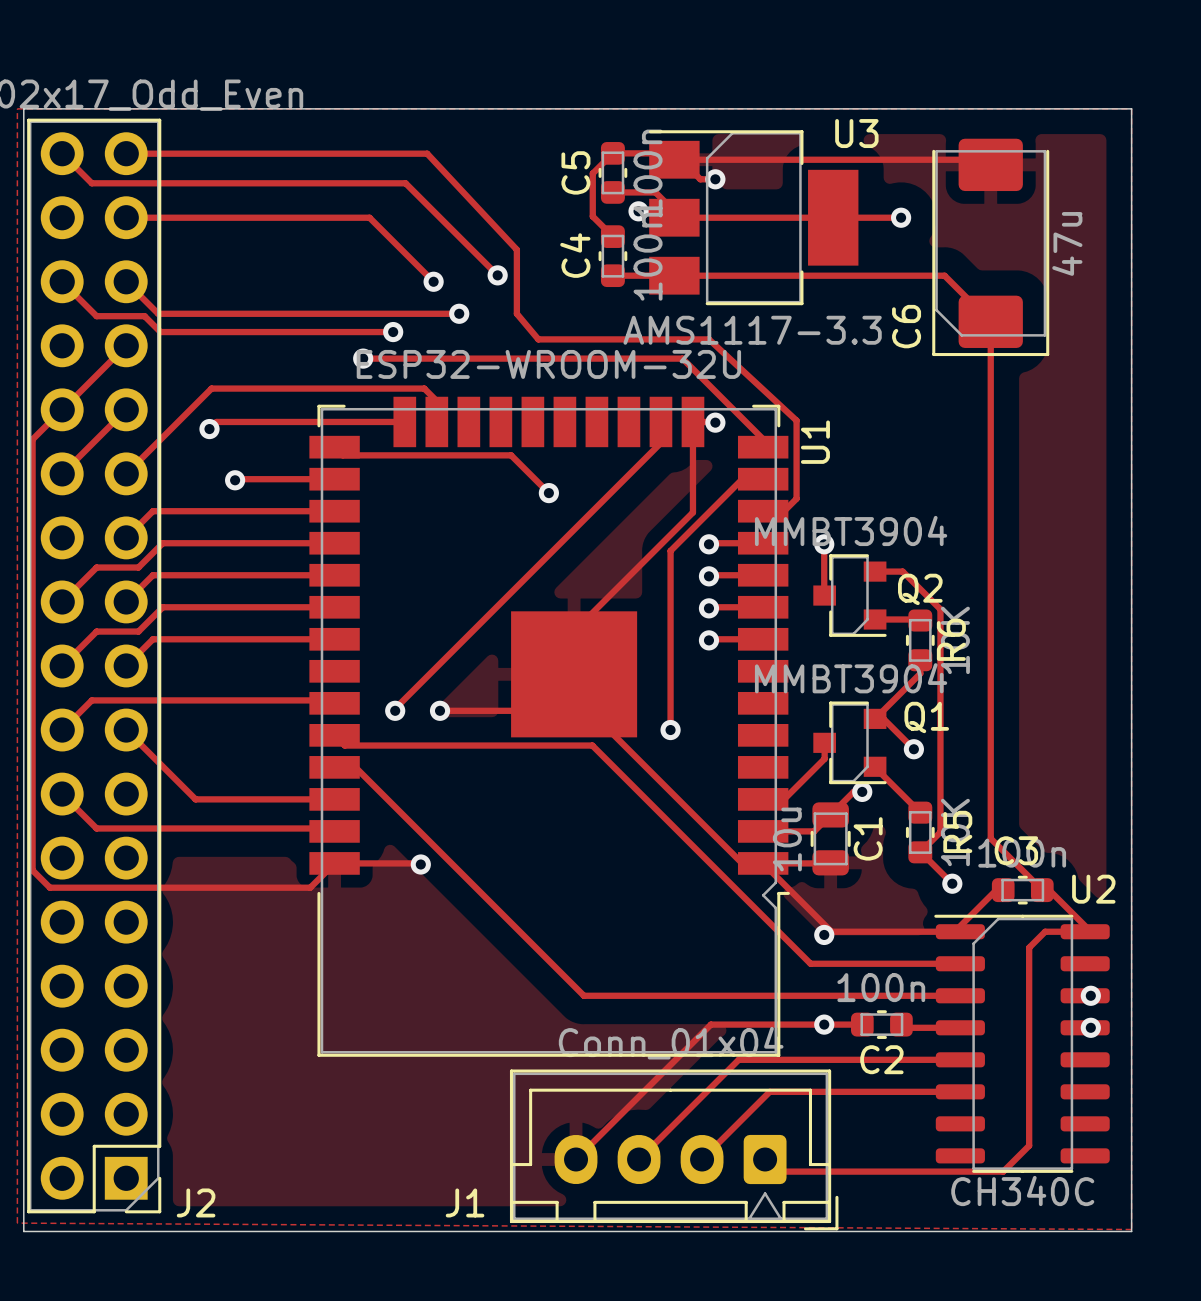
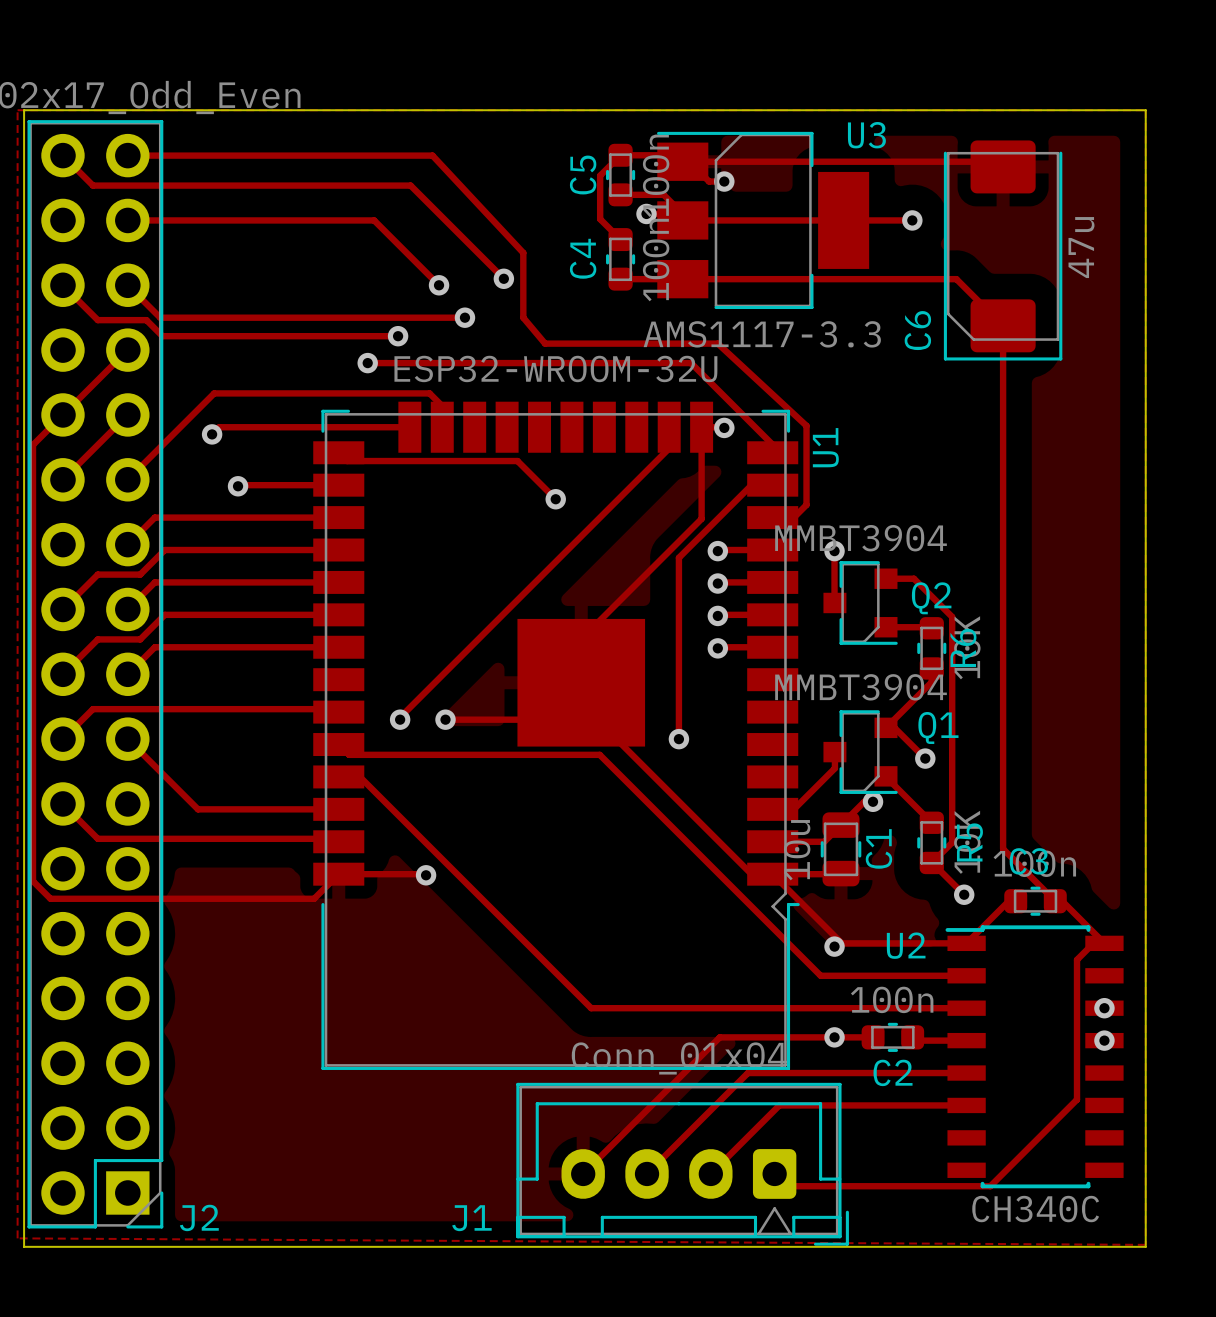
U2 name position: U2 (1093, 889) -> U2 (906, 945)
U2 footprint: [934, 914, 1110, 1173] -> [945, 925, 1124, 1189]
track: (1080, 931) (1045, 931) (1029, 947) (1029, 1145) (1003, 1171) (978, 1171) -> (1093, 943) (1077, 959) (1077, 1099) (990, 1186)

